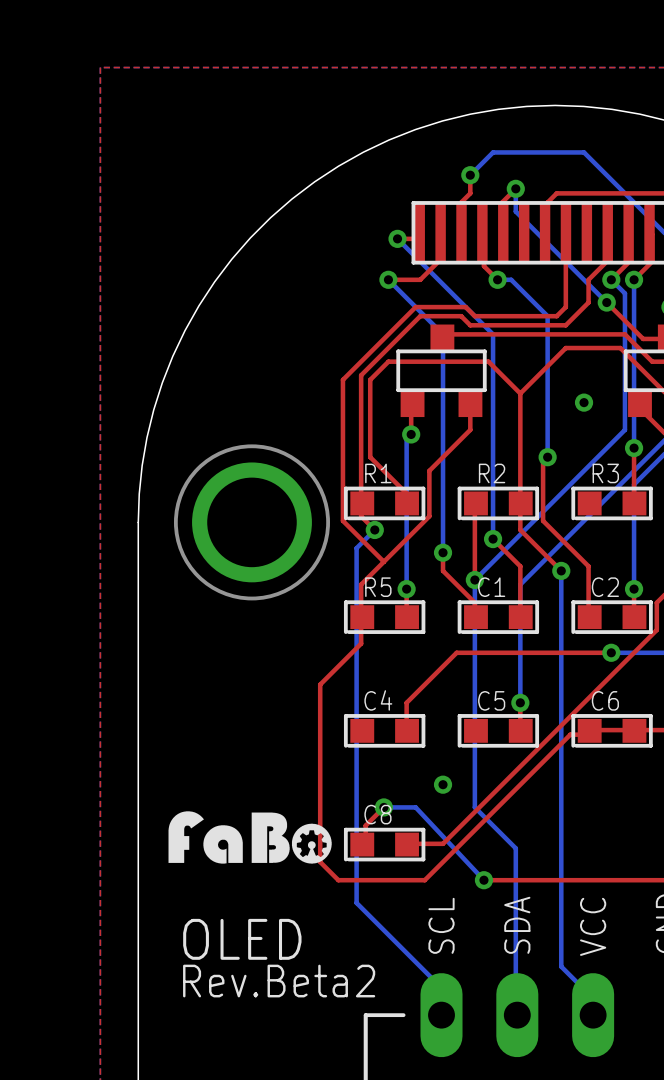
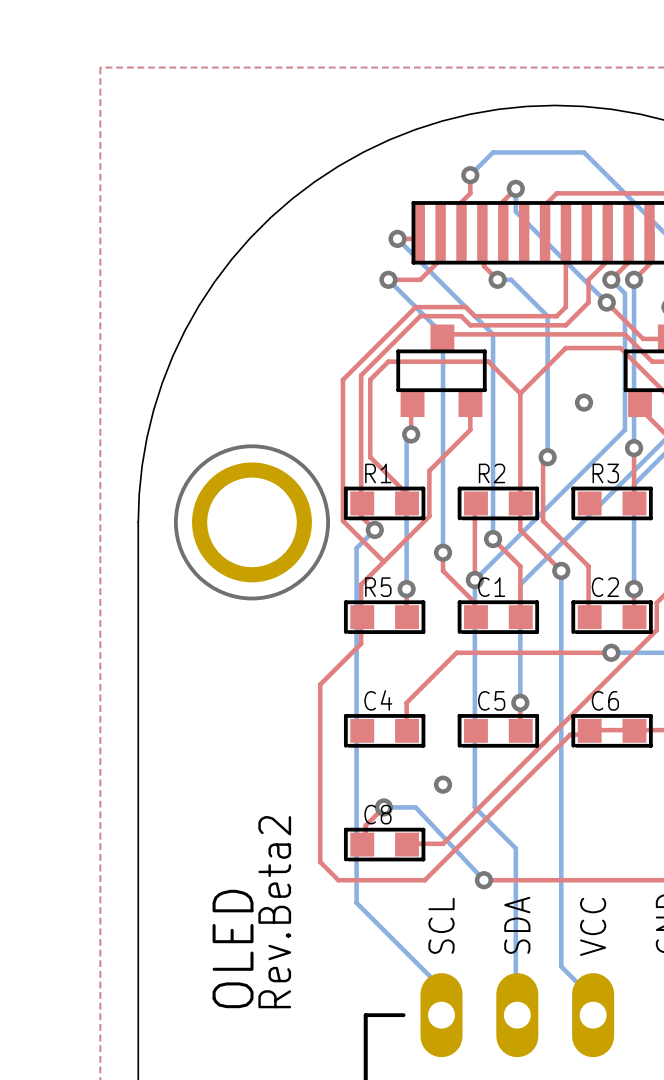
drawing: [168, 811, 332, 864] -> none
text rotation: 0° (242, 939) -> 90° counterclockwise (233, 948)
text rotation: 0° (279, 981) -> 90° counterclockwise (274, 912)

